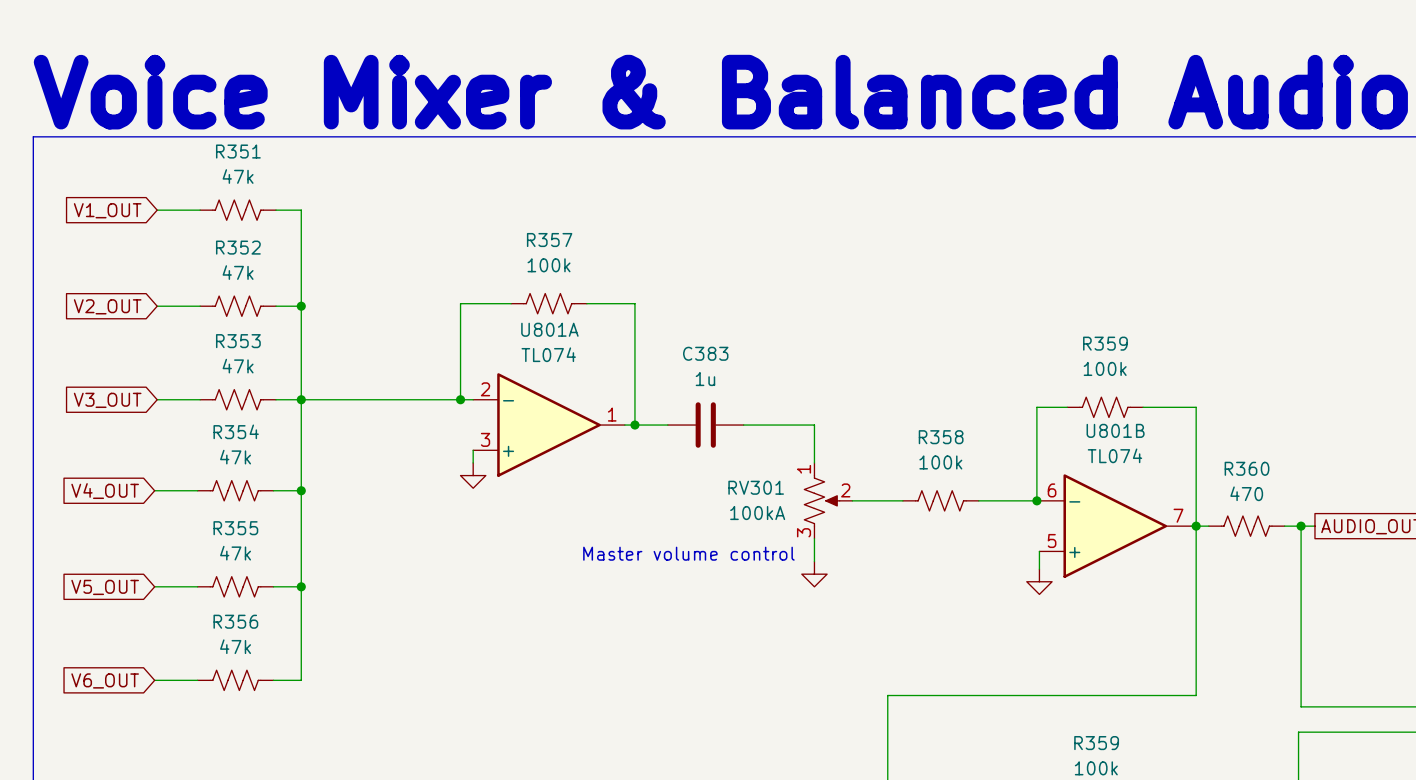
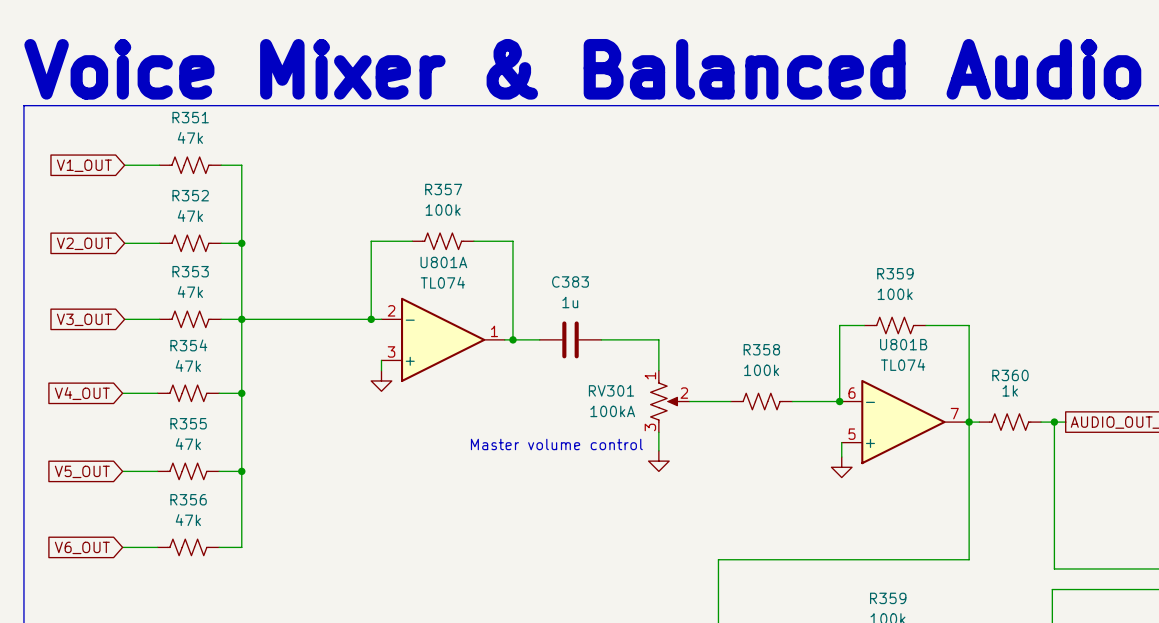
R360 value: 470 (1246, 493) -> 1k (1010, 390)

